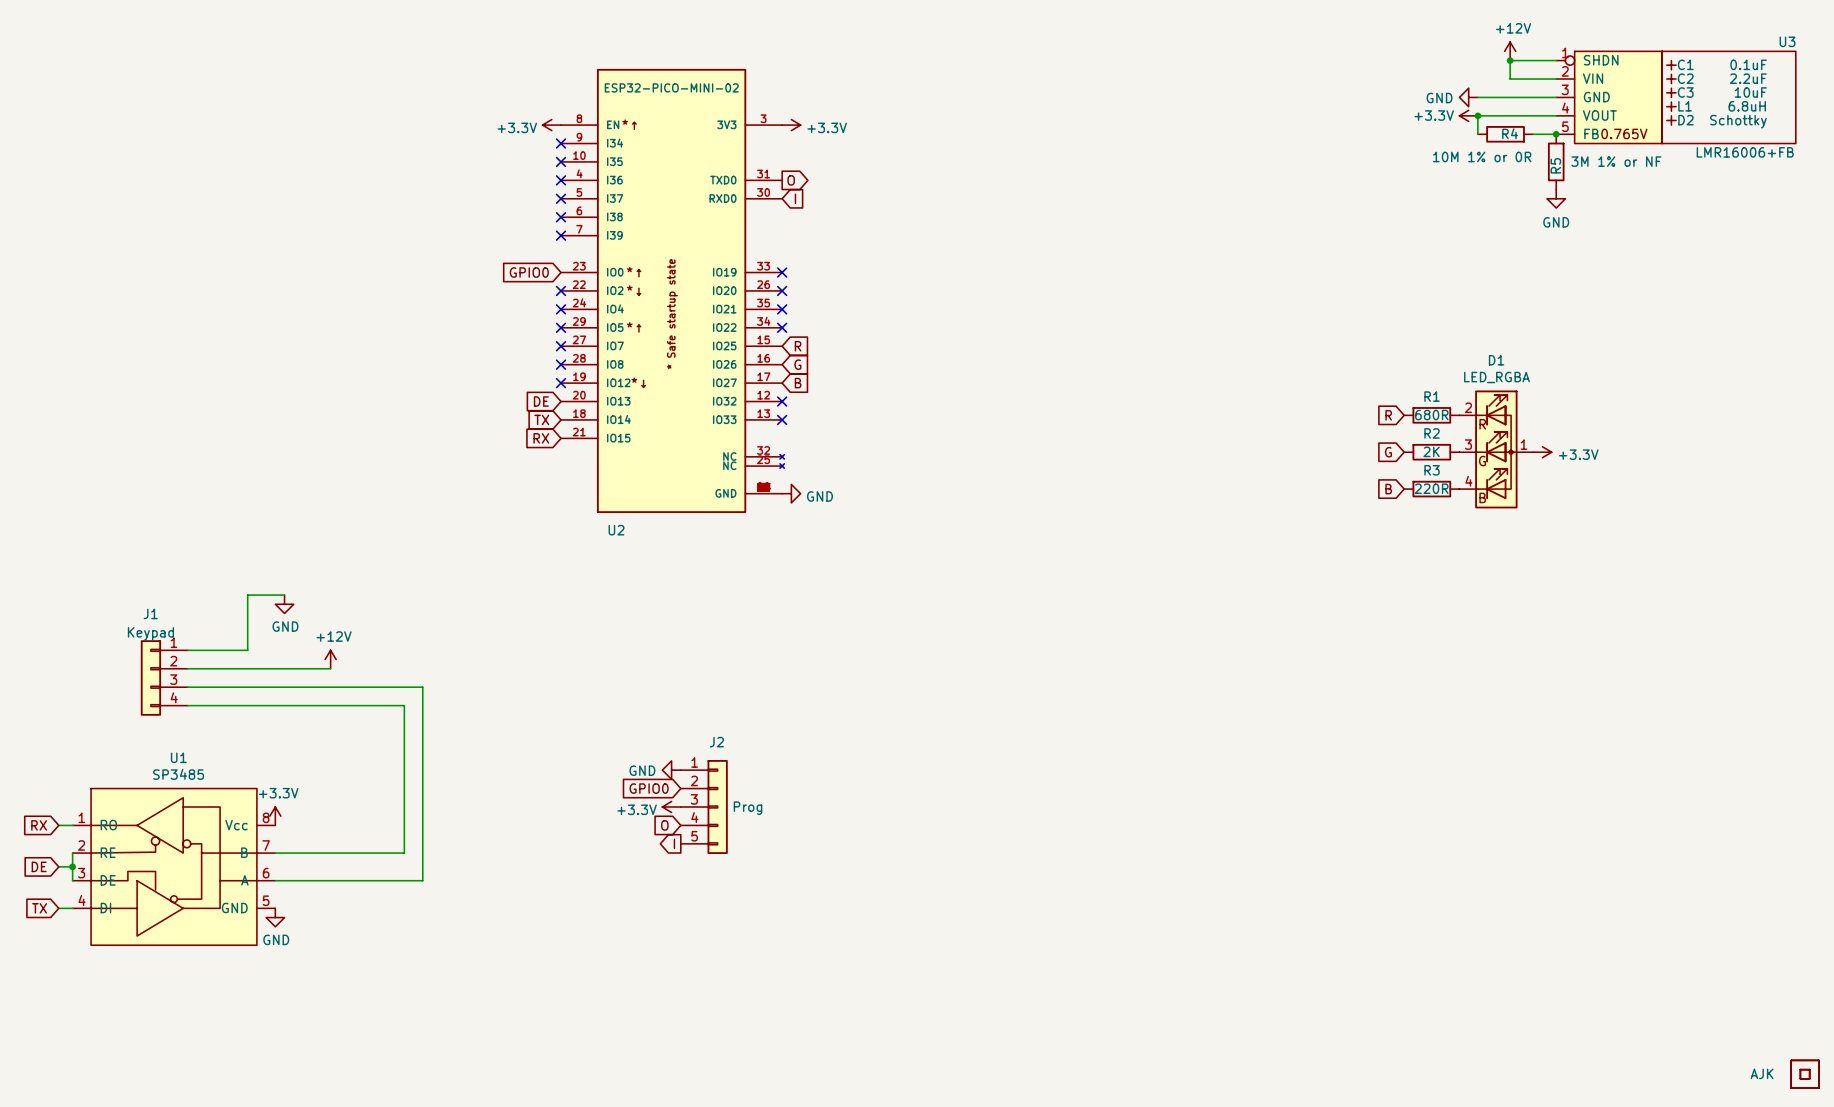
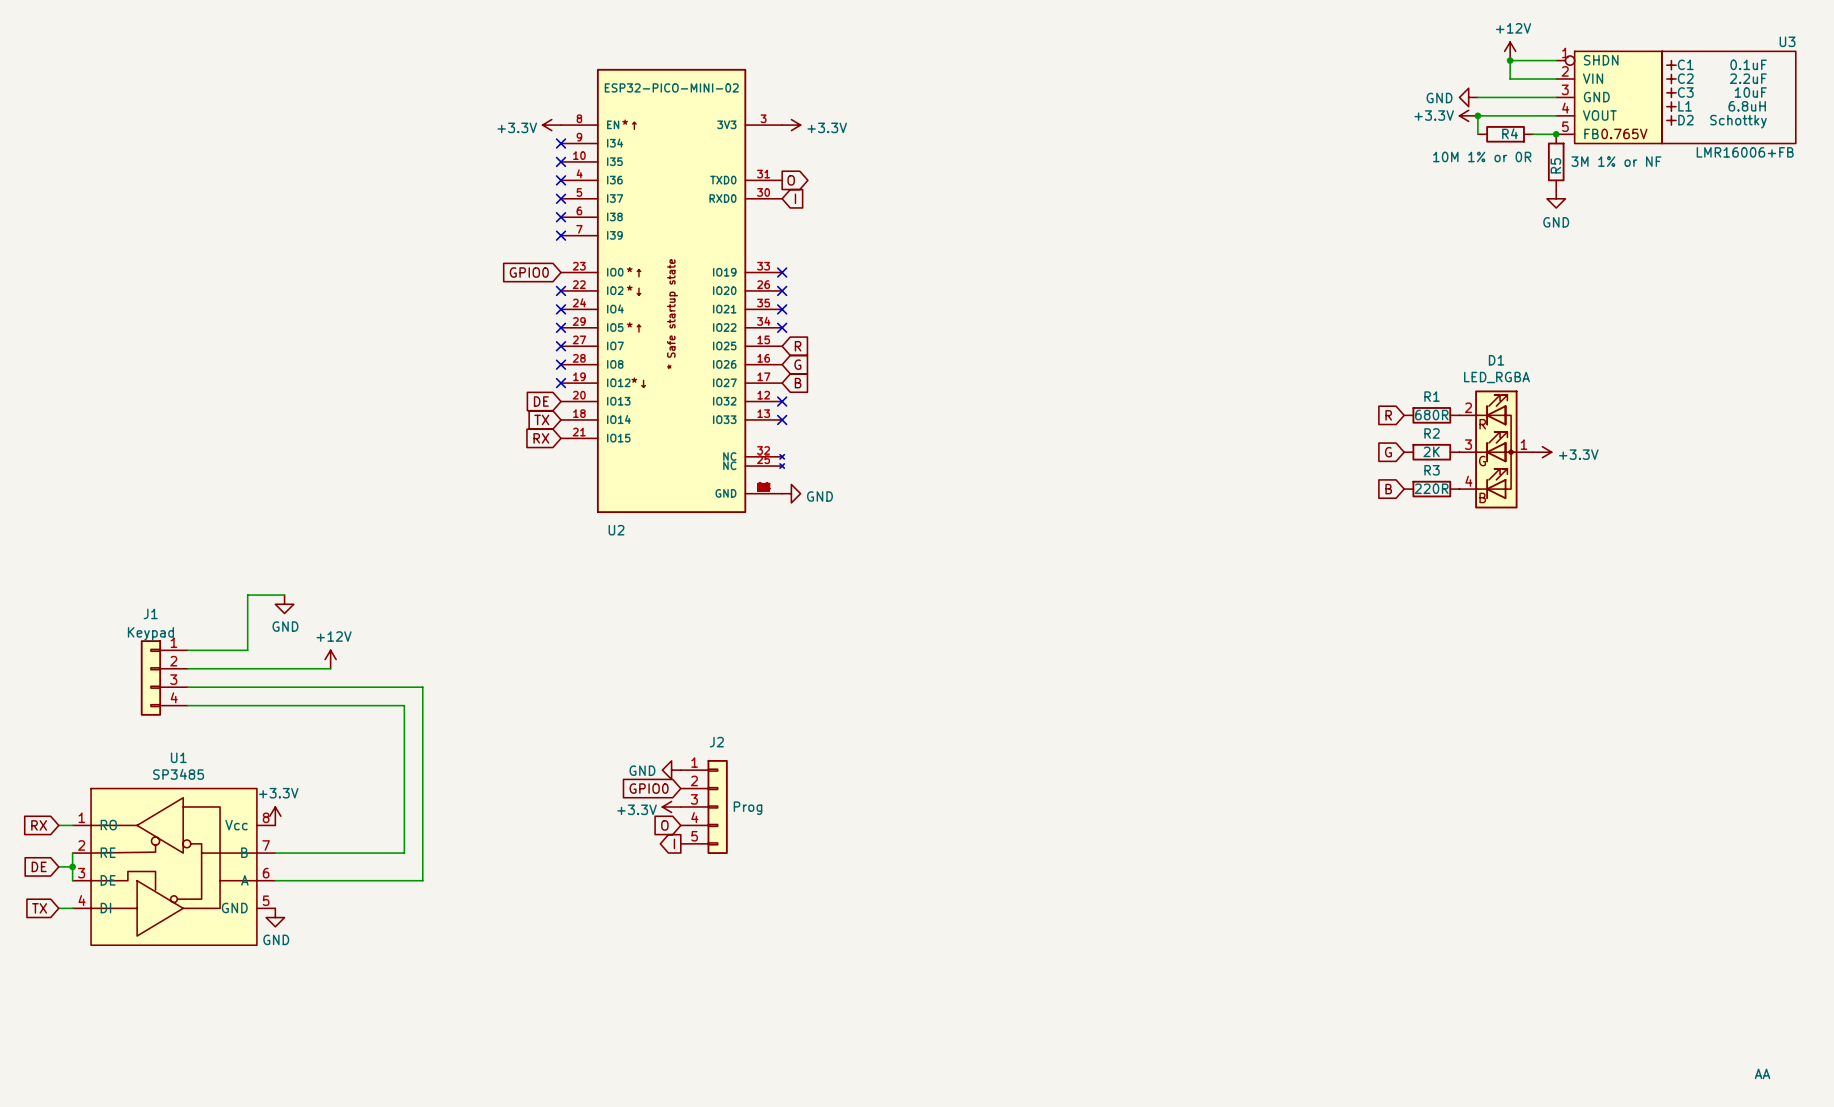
part value: AJK (1762, 1073) -> AA (1762, 1073)
part: (1805, 1074) -> none

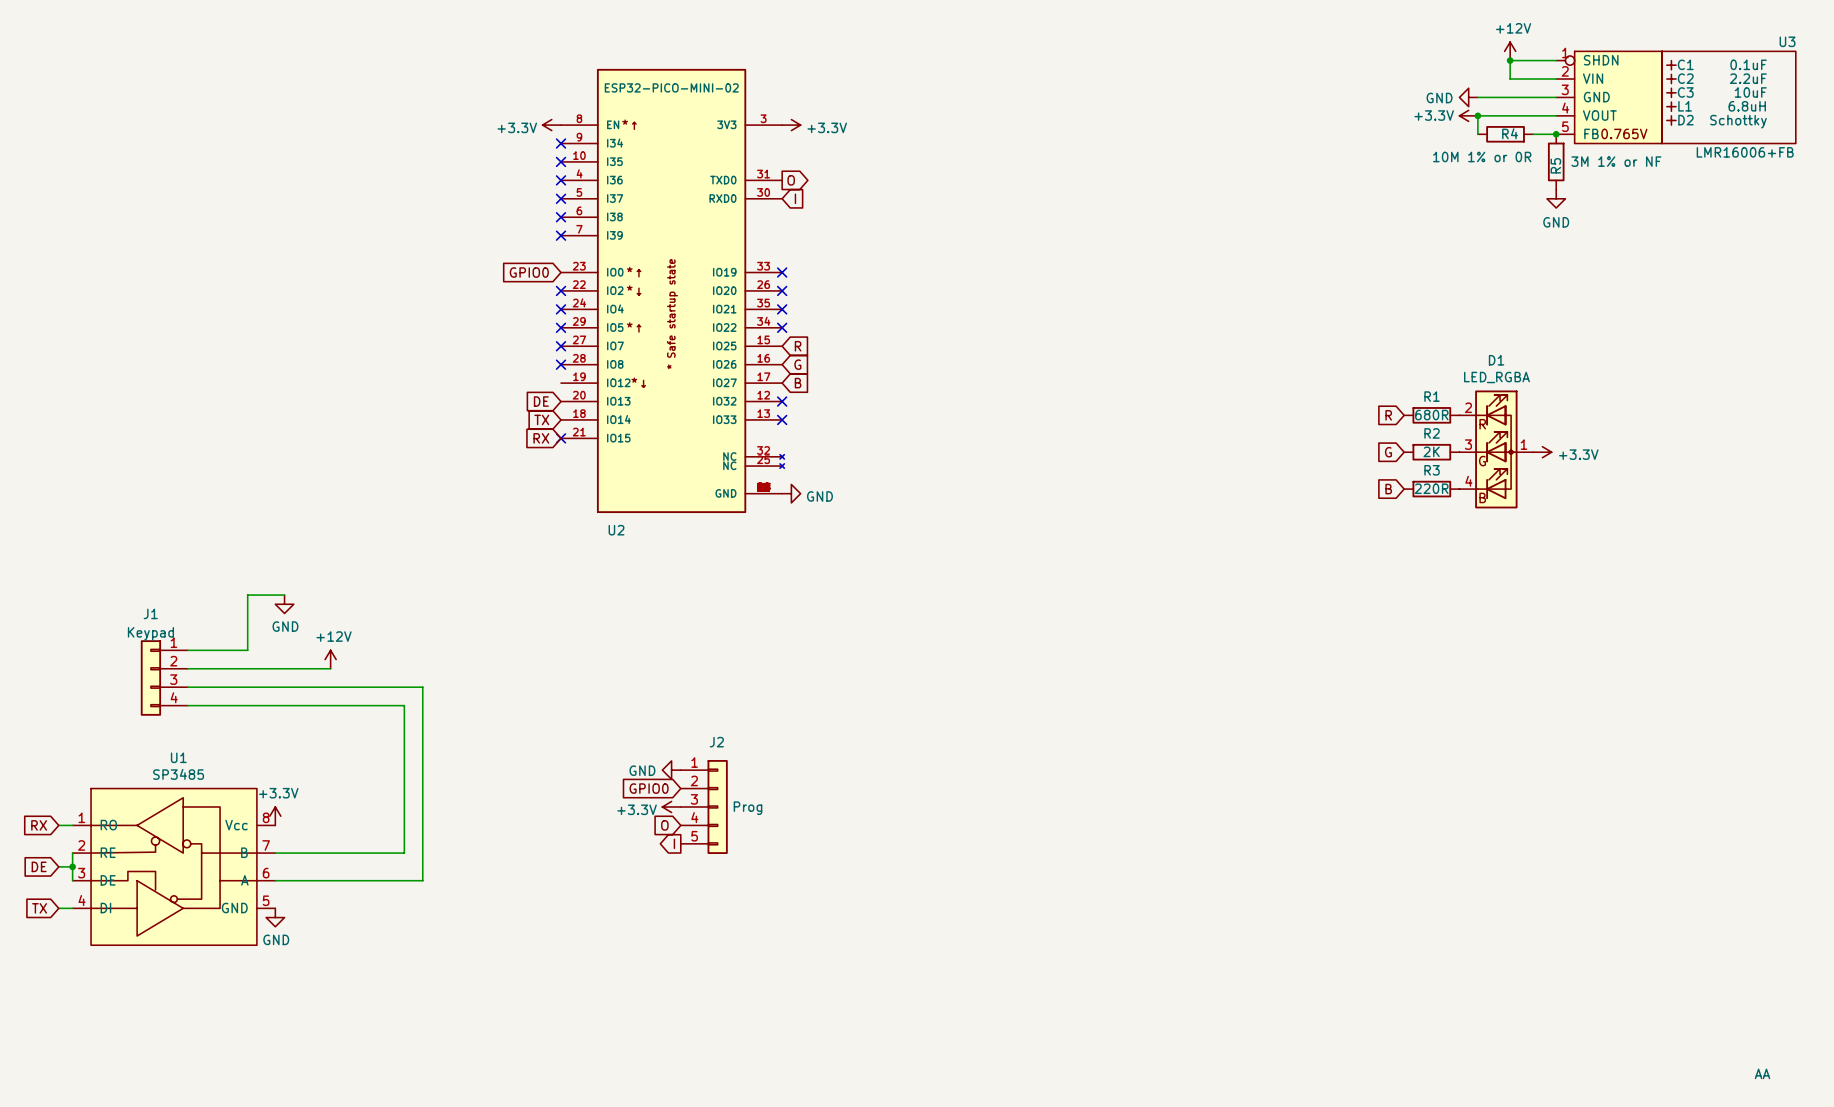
U2 symbol: [561, 68, 785, 514] -> [561, 68, 785, 514]
no-connect mark: (561, 383) -> none
no-connect mark: none -> (561, 438)

